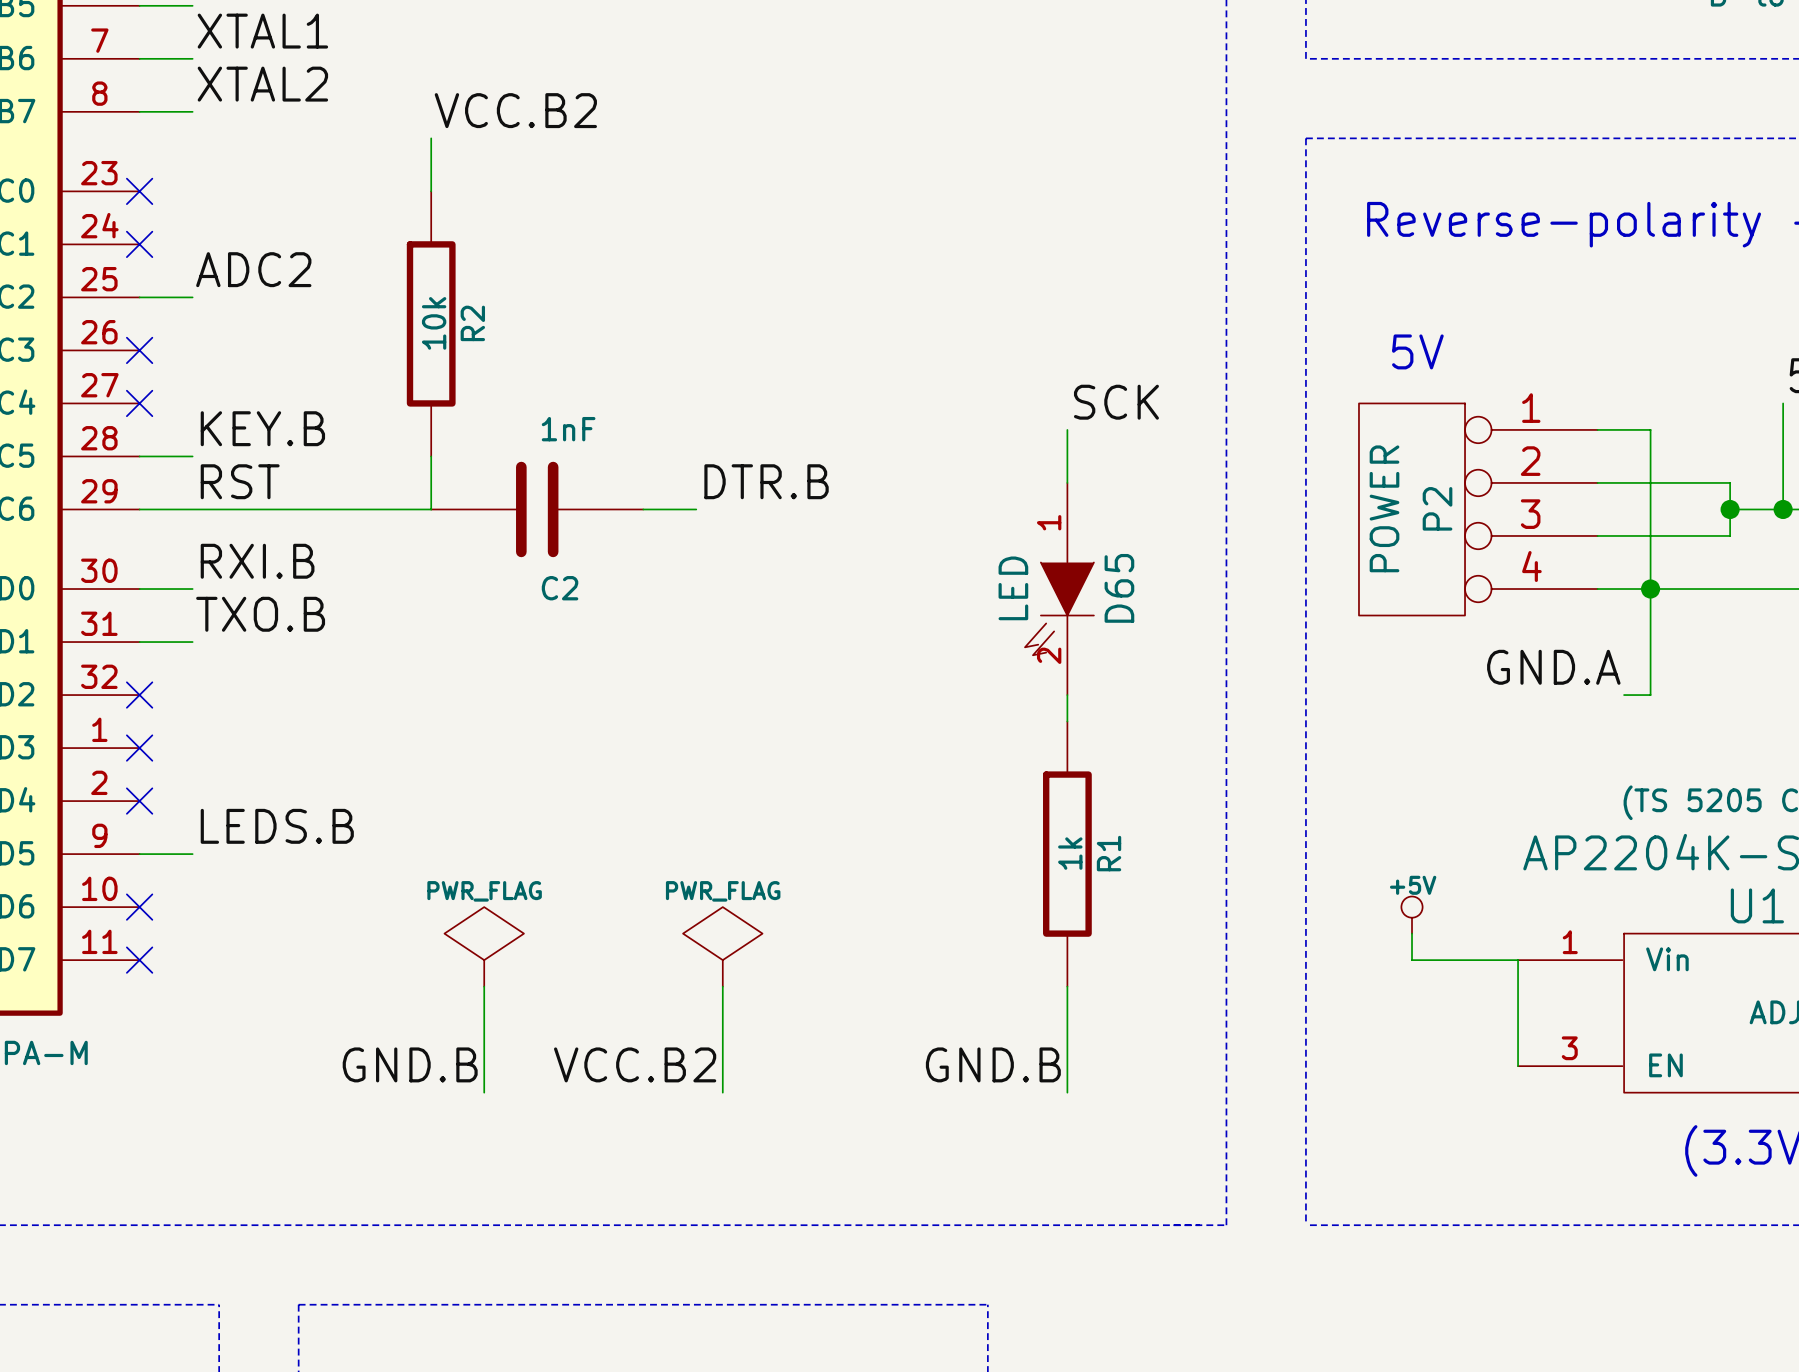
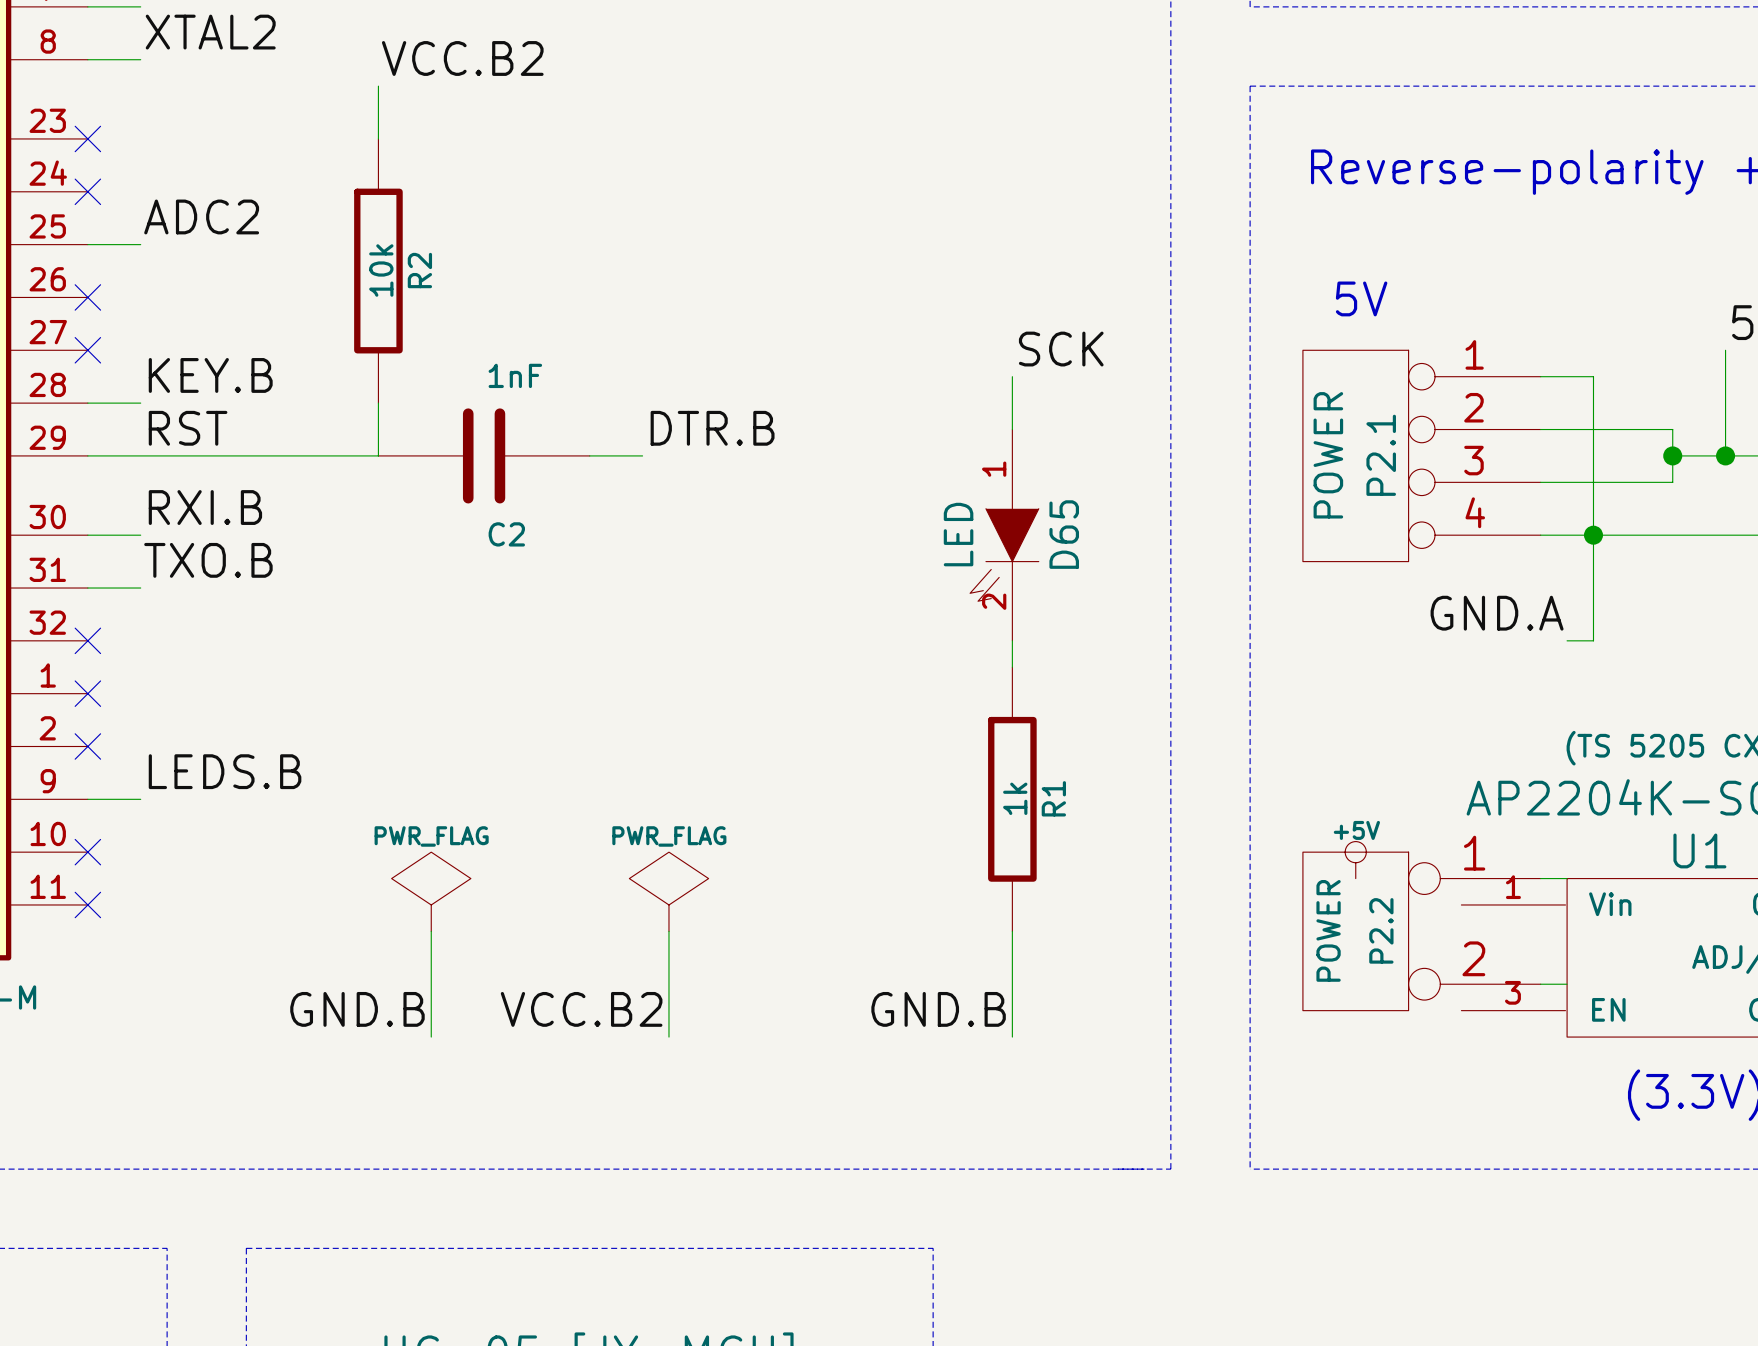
P2 name: P2 (1437, 508) -> P2.1 (1381, 455)
wire: (1412, 933) (1412, 960) (1518, 960) (1518, 1066) -> none
wire: none -> (1540, 878) (1567, 878)
P2.2: none -> POWER (1421, 931)
wire: none -> (1540, 984) (1567, 984)

